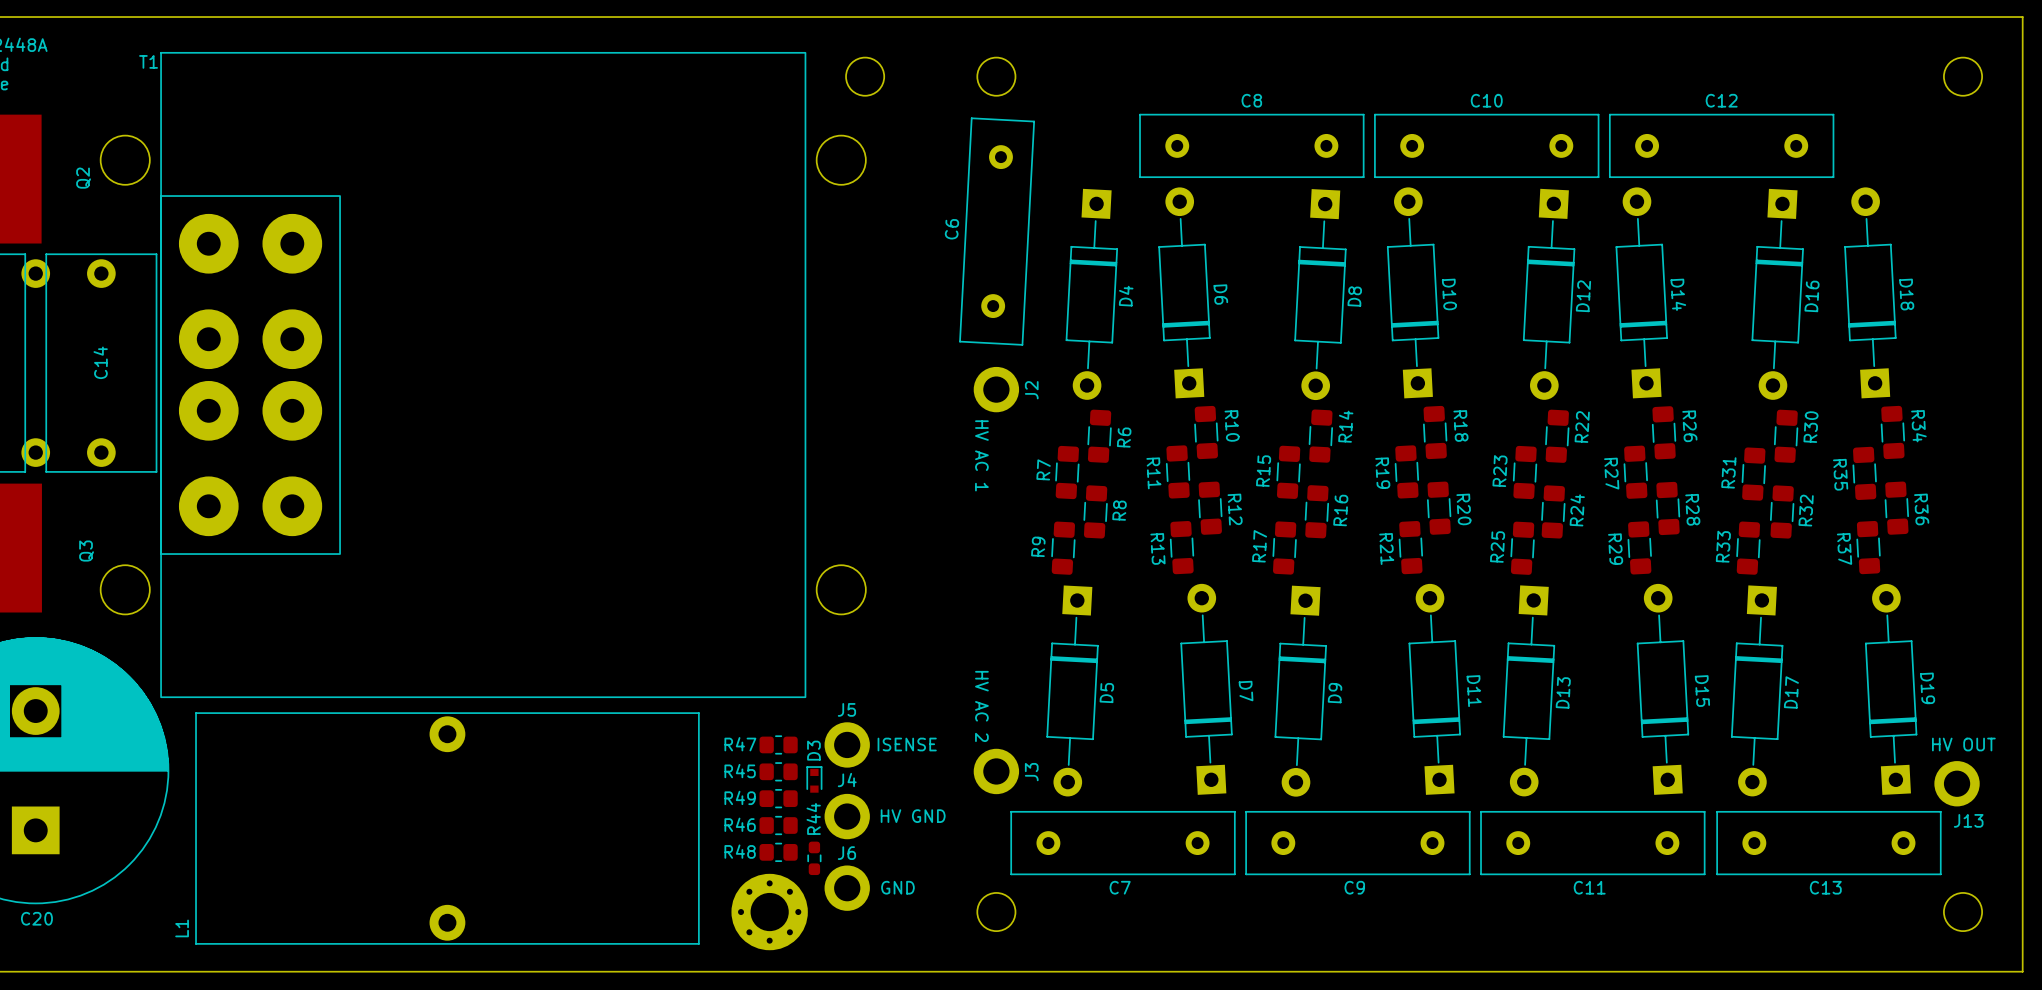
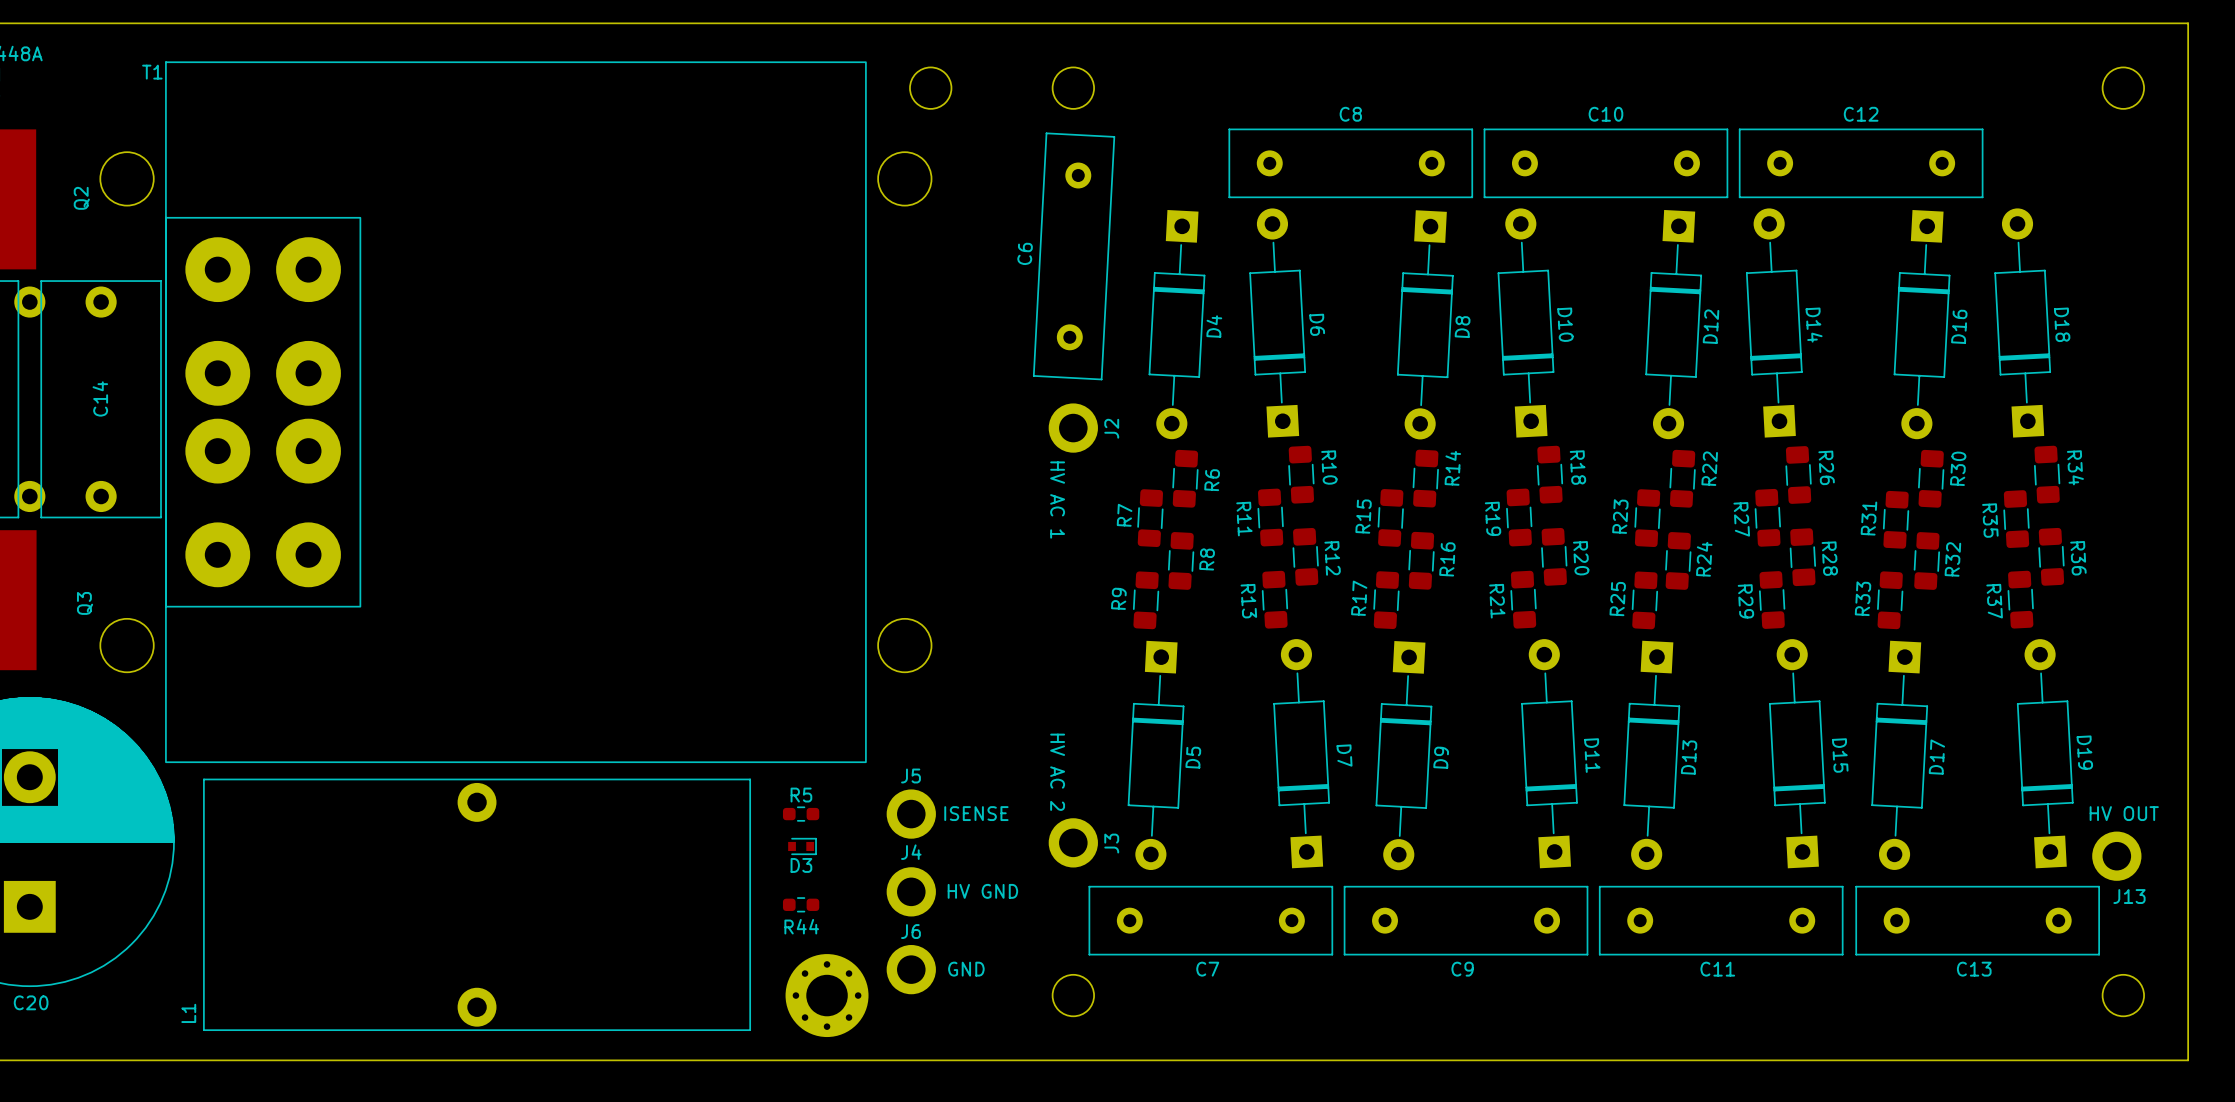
R5: none -> (801, 814)
R47: (778, 744) -> none
D3 name position: D3 (813, 750) -> D3 (801, 865)
R45: (778, 771) -> none
D3 rotation: 0° (814, 779) -> 90° clockwise (802, 846)
D3 position: (814, 779) -> (802, 846)
R49: (778, 798) -> none
R44 name position: R44 (813, 818) -> R44 (801, 926)
R46: (778, 825) -> none
R48: (778, 852) -> none
R44 rotation: 0° (814, 858) -> 90° clockwise (801, 904)
R44 position: (814, 858) -> (801, 904)

